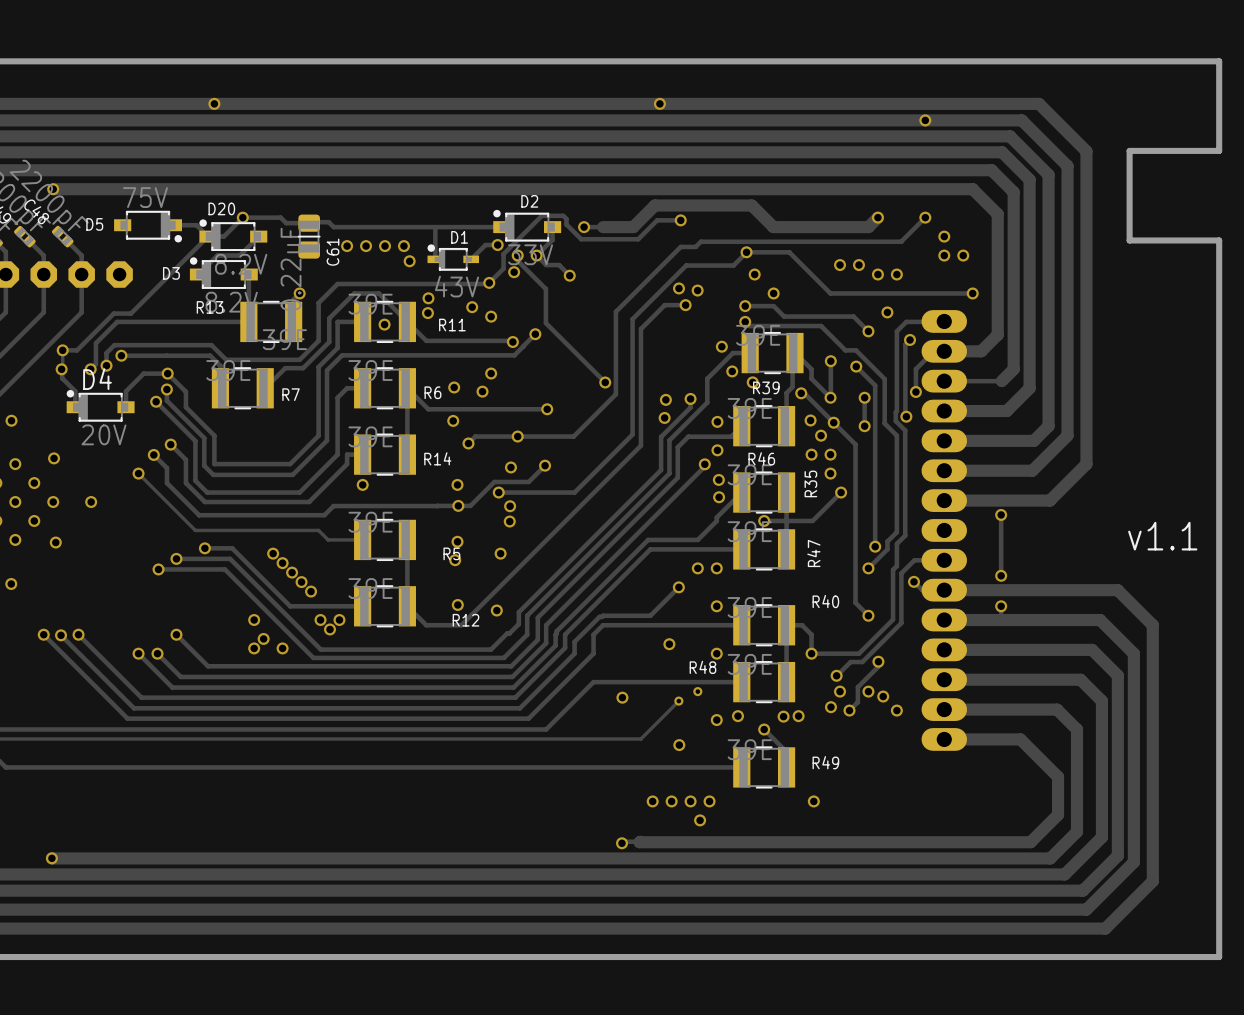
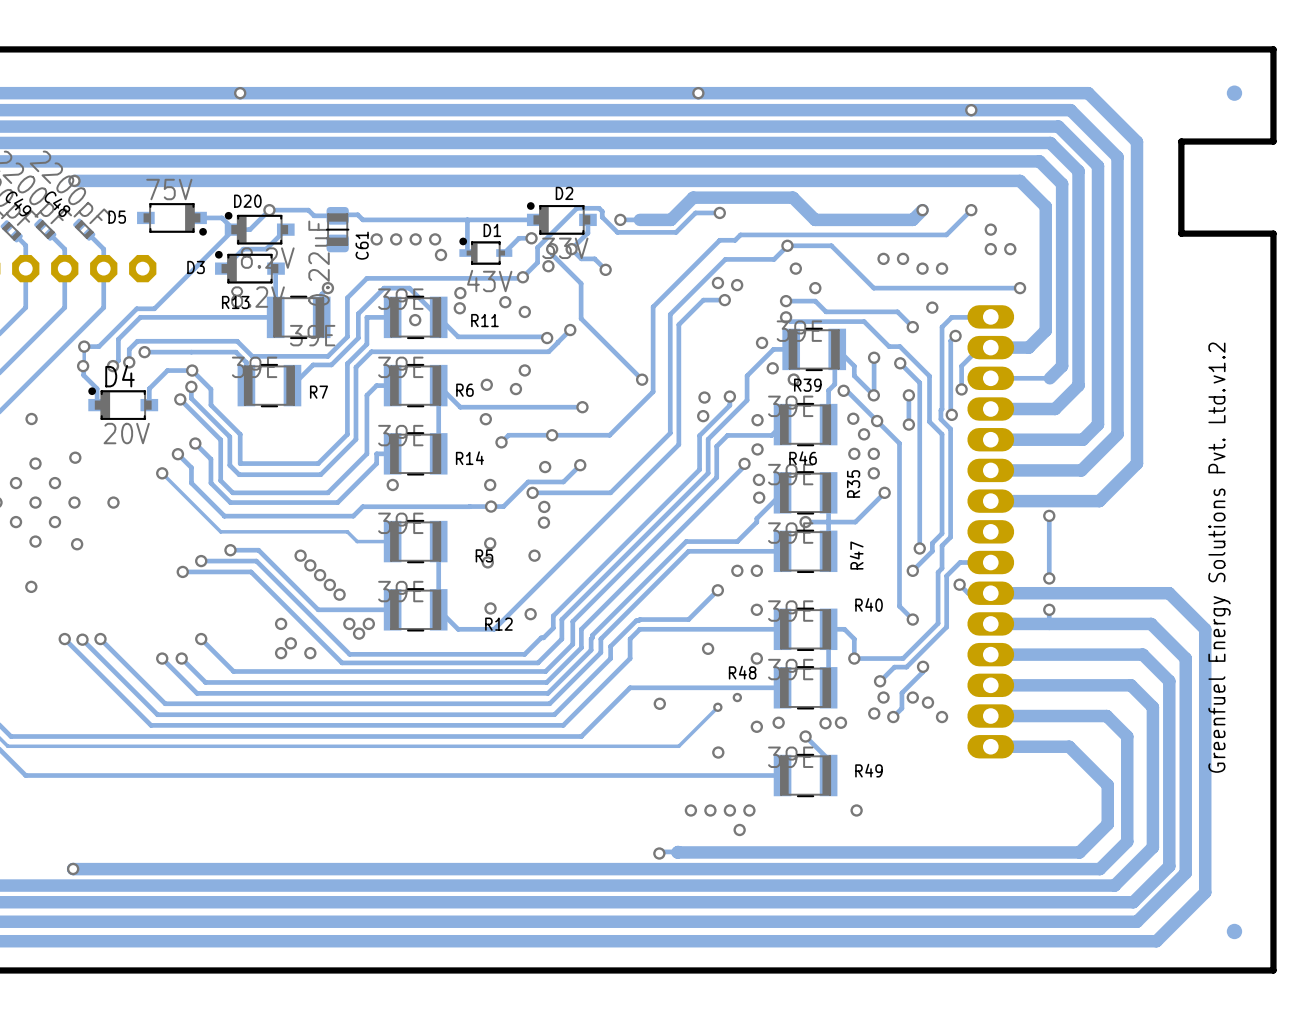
part: none -> (1234, 93)
text: none -> v1.2 (1216, 363)
text: v1.1 (1162, 536) -> none
text: none -> Greenfuel Energy Solutions Pvt. Ltd. (1219, 580)
part: none -> (1234, 931)

